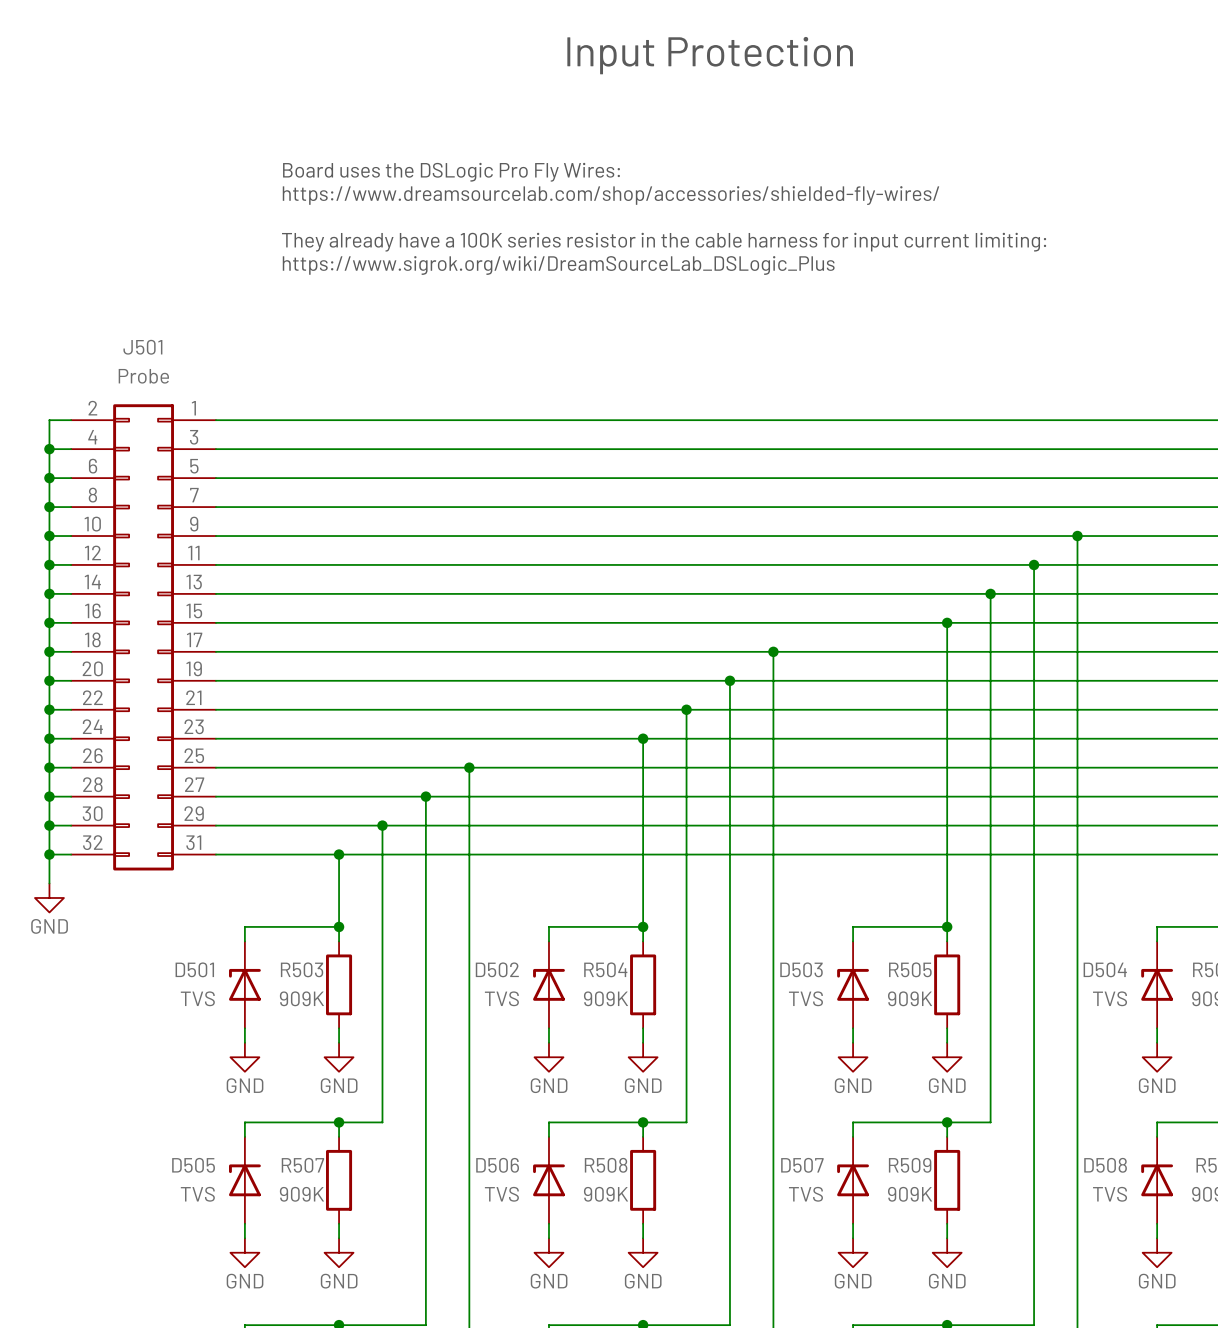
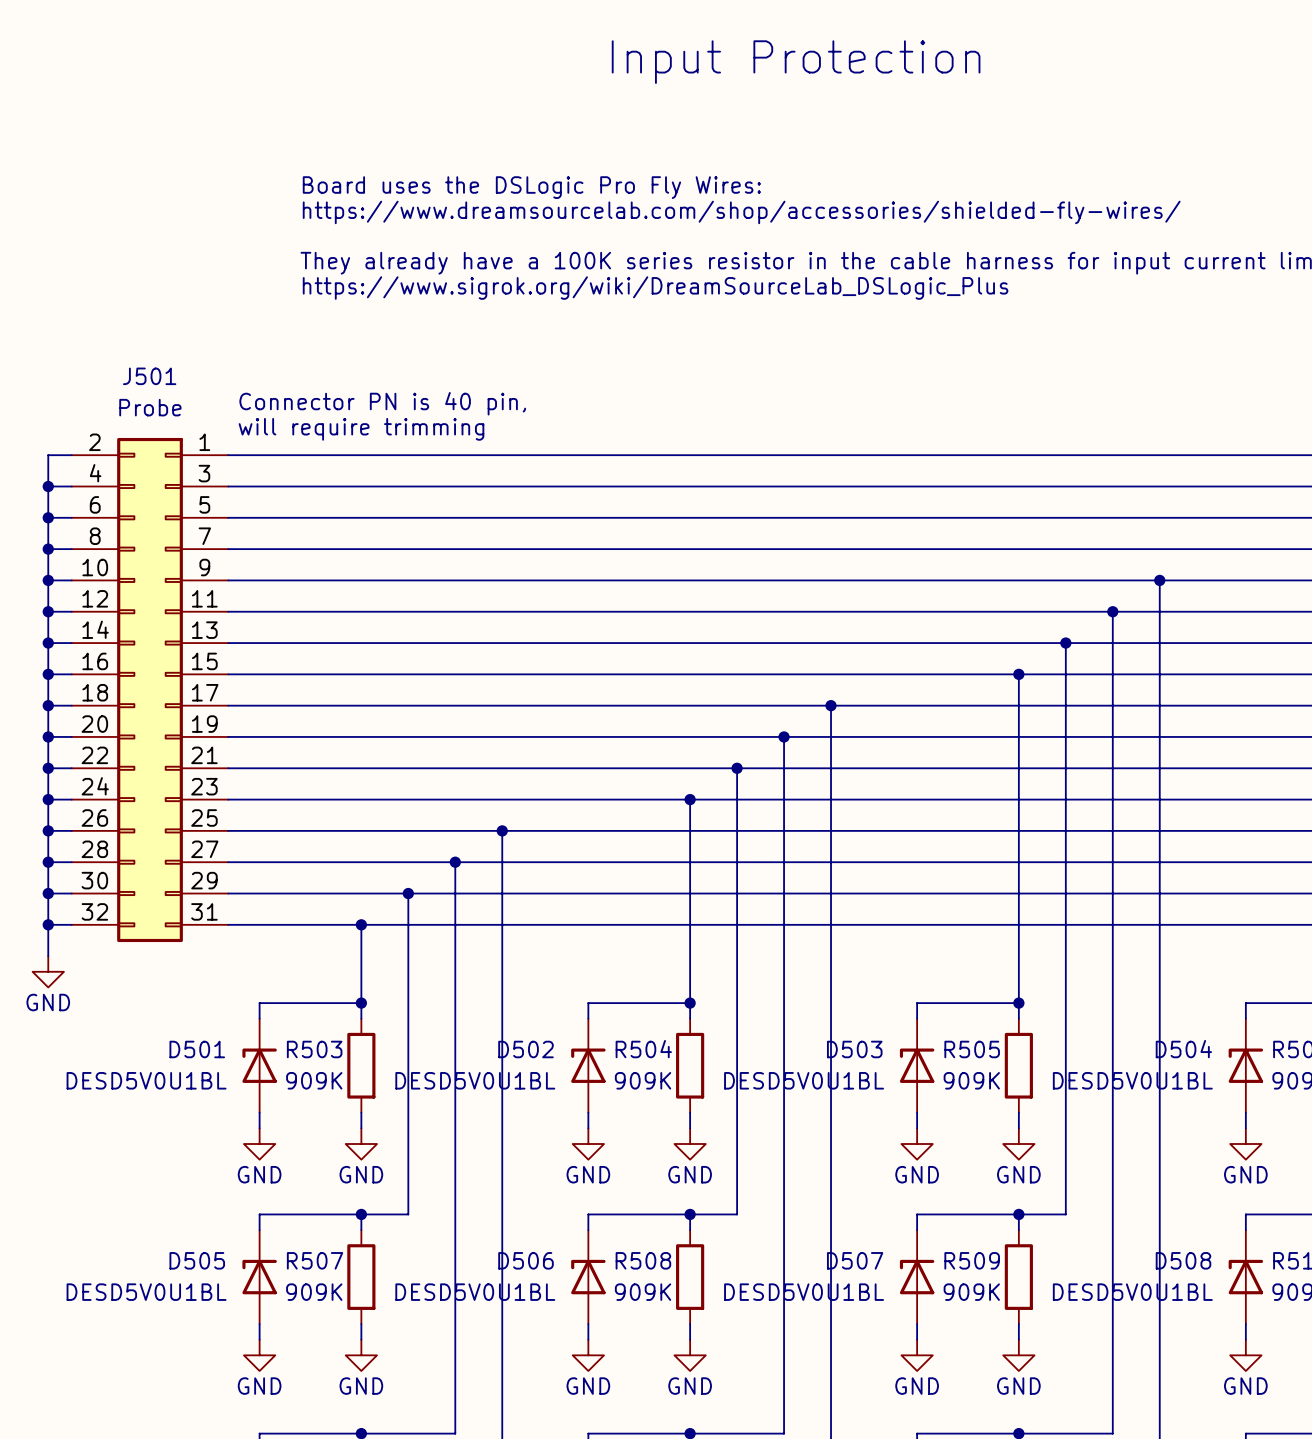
text: none -> Connector PN is 40 pin, (382, 403)
text: none -> will require trimming (361, 429)
D501 value: TVS (197, 998) -> DESD5V0U1BL (146, 1080)
D502 value: TVS (501, 998) -> DESD5V0U1BL (475, 1080)
D503 value: TVS (805, 998) -> DESD5V0U1BL (804, 1080)
D504 value: TVS (1110, 998) -> DESD5V0U1BL (1132, 1080)
D505 value: TVS (197, 1194) -> DESD5V0U1BL (146, 1292)
D506 value: TVS (501, 1194) -> DESD5V0U1BL (475, 1292)
D507 value: TVS (805, 1194) -> DESD5V0U1BL (804, 1292)
D508 value: TVS (1110, 1194) -> DESD5V0U1BL (1132, 1292)

